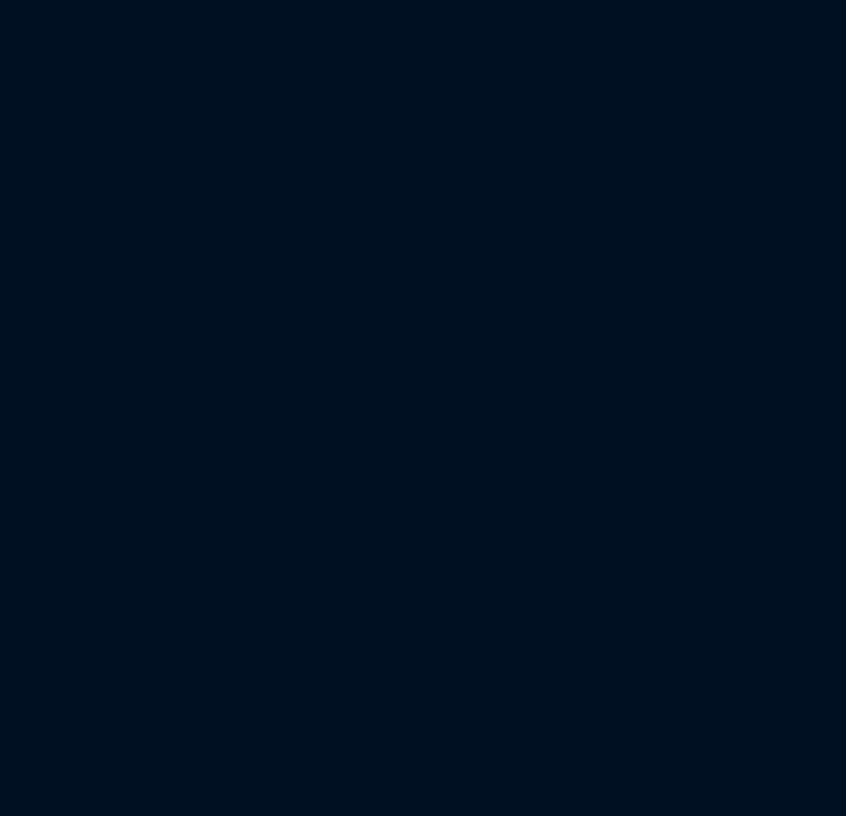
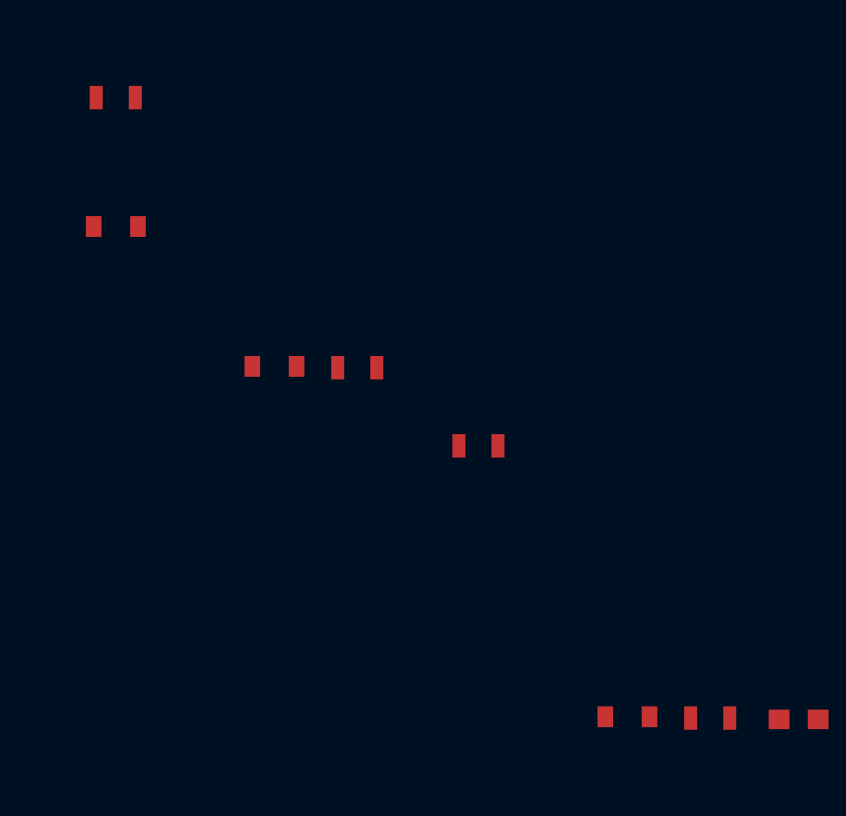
part: none -> (115, 97)
part: none -> (115, 226)
part: none -> (274, 366)
part: none -> (357, 367)
part: none -> (478, 445)
part: none -> (627, 716)
part: none -> (710, 718)
part: none -> (798, 719)

